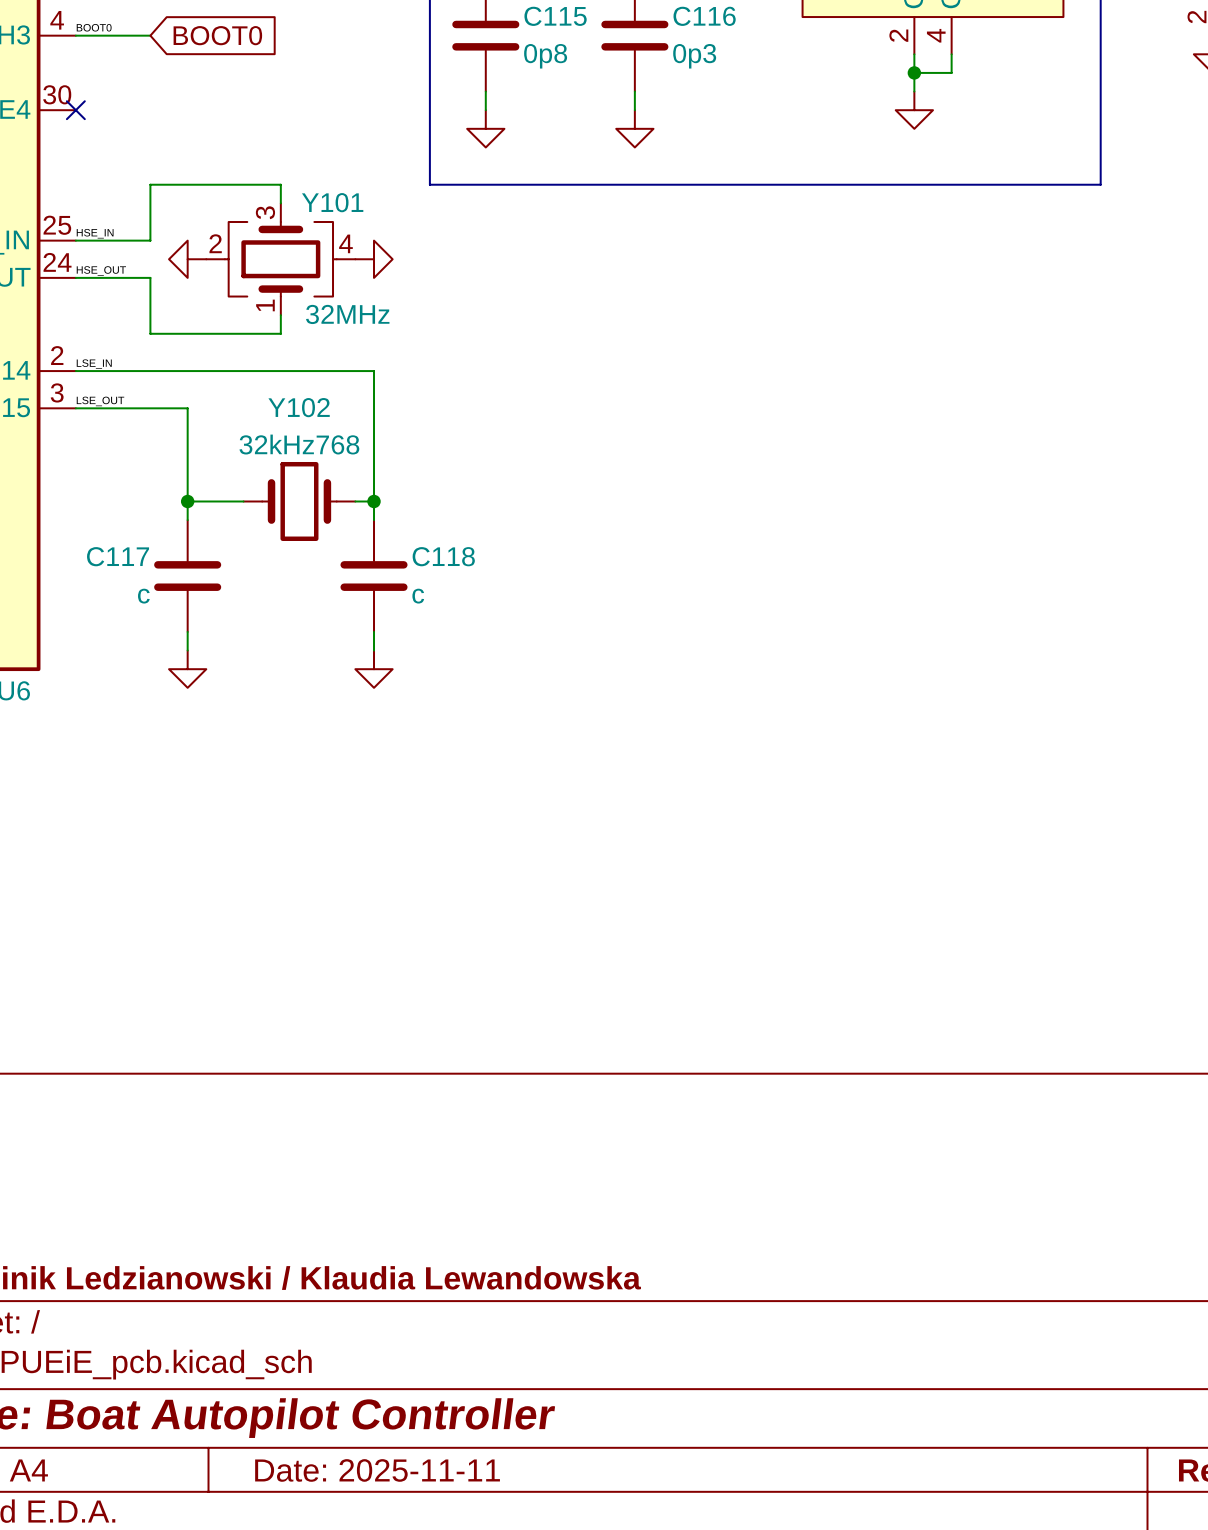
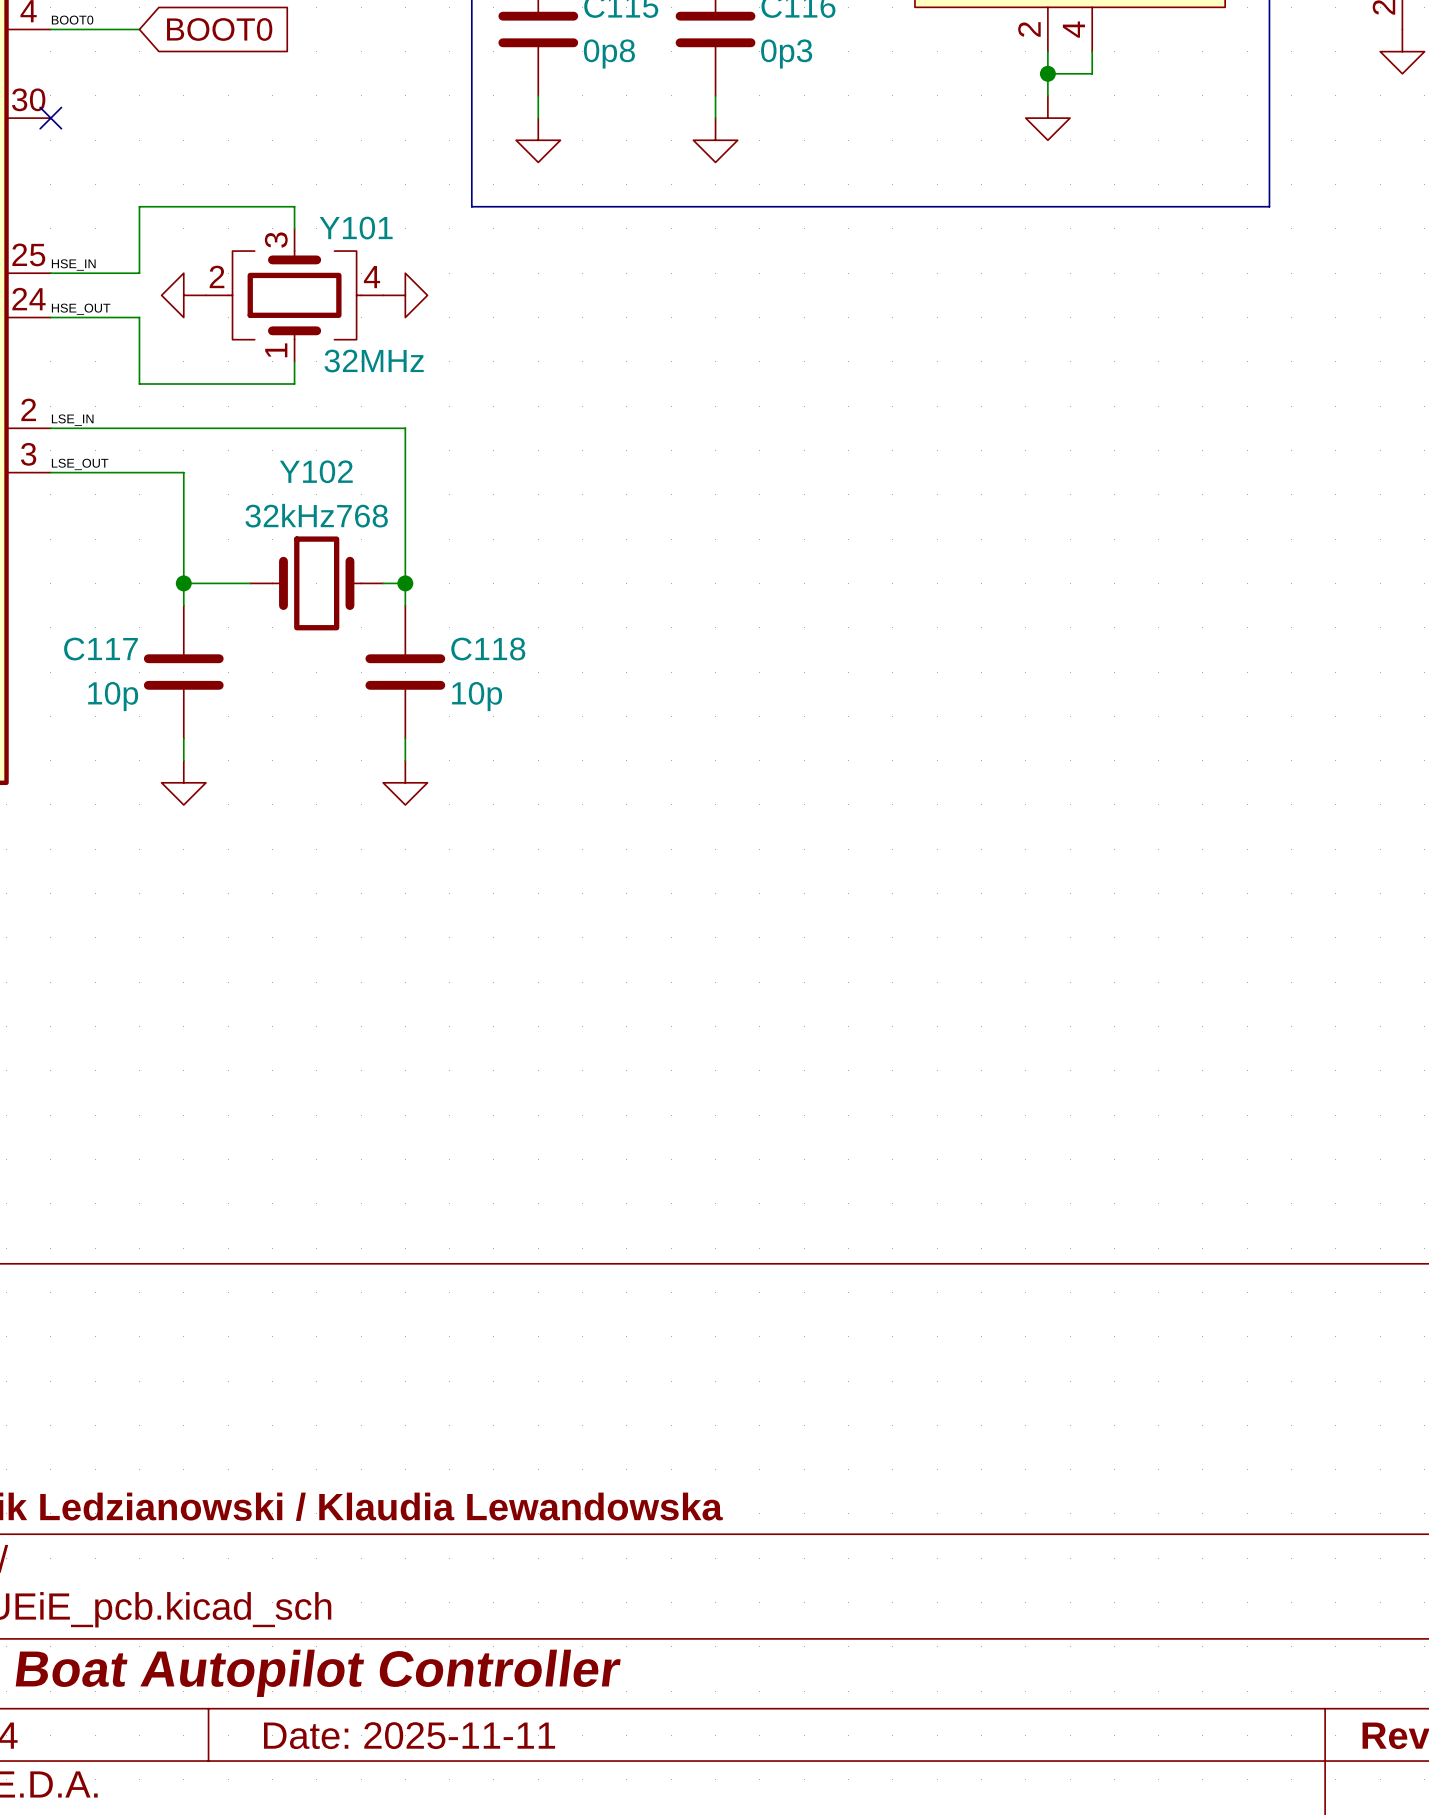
C117 value: c (143, 596) -> 10p (113, 696)
C118 value: c (418, 596) -> 10p (477, 696)

